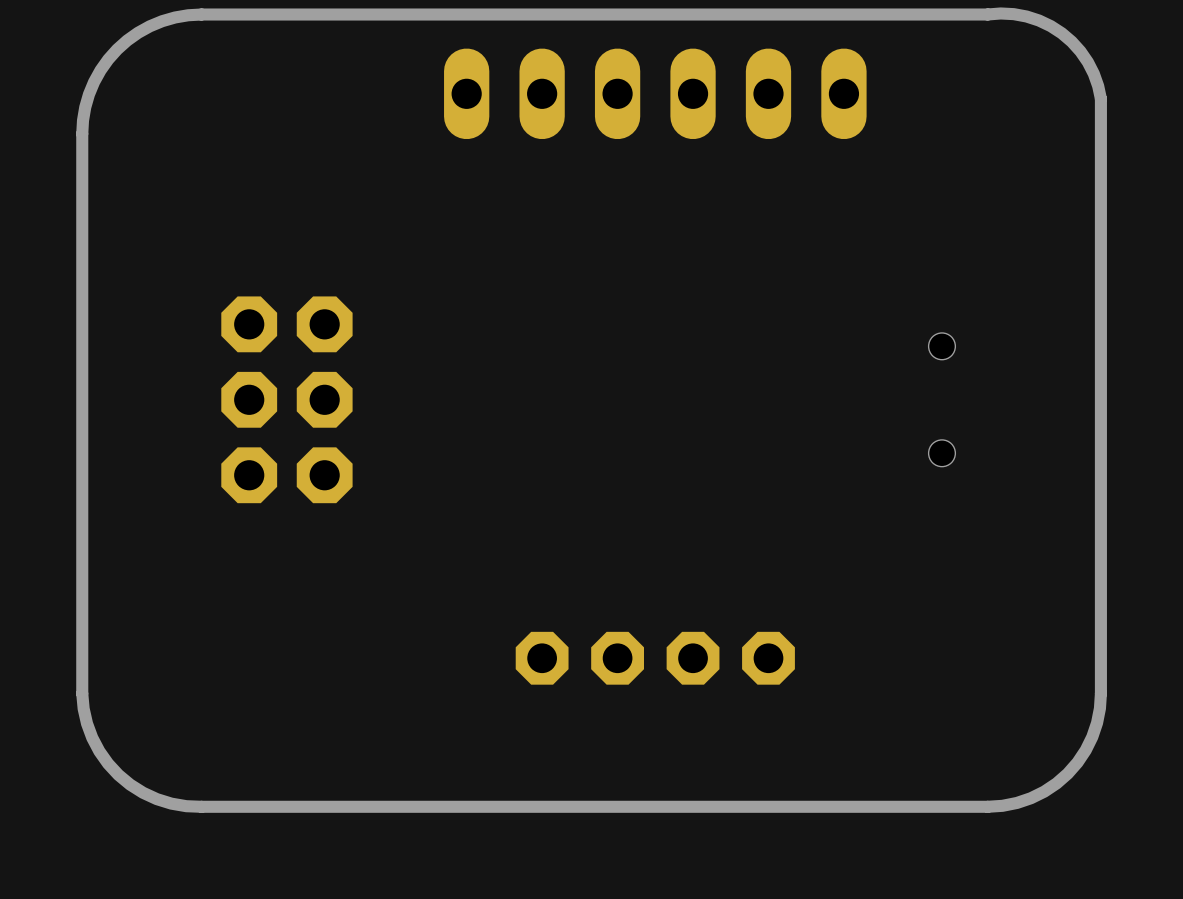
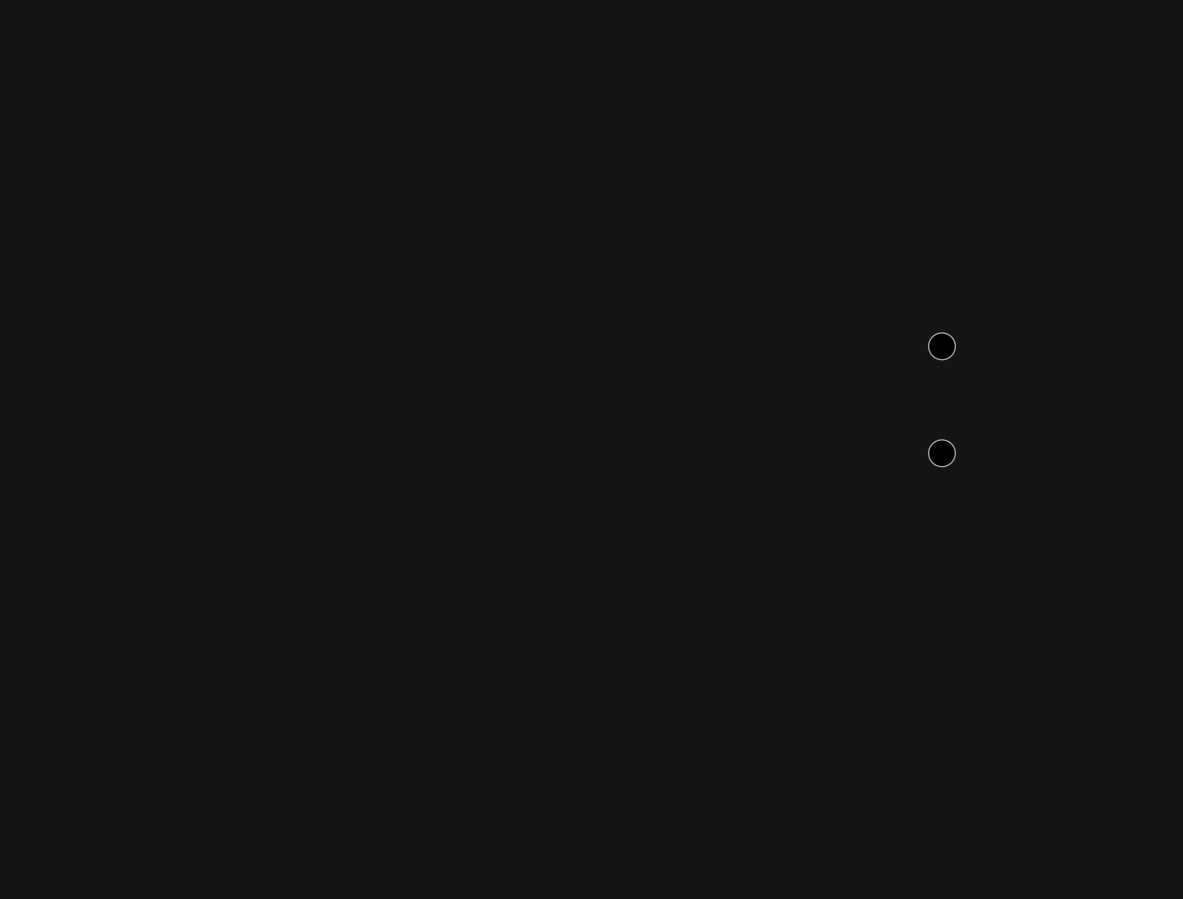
board edge: (987, 14) (201, 14) (162, 21) (127, 40) (108, 59) (94, 82) (85, 107) (82, 133) (82, 693) (87, 723) (92, 737) (108, 763) (130, 784) (156, 799) (186, 806) (201, 806) (987, 806) (1017, 802) (1044, 791) (1056, 783) (1067, 773) (1085, 750) (1097, 722) (1100, 693) (1100, 98) (1093, 73) (1087, 62) (1080, 51) (1061, 33) (1039, 20) (1026, 16) (1013, 14) (987, 14) -> none
part: (655, 93) -> none
part: (286, 399) -> none
part: (655, 658) -> none

